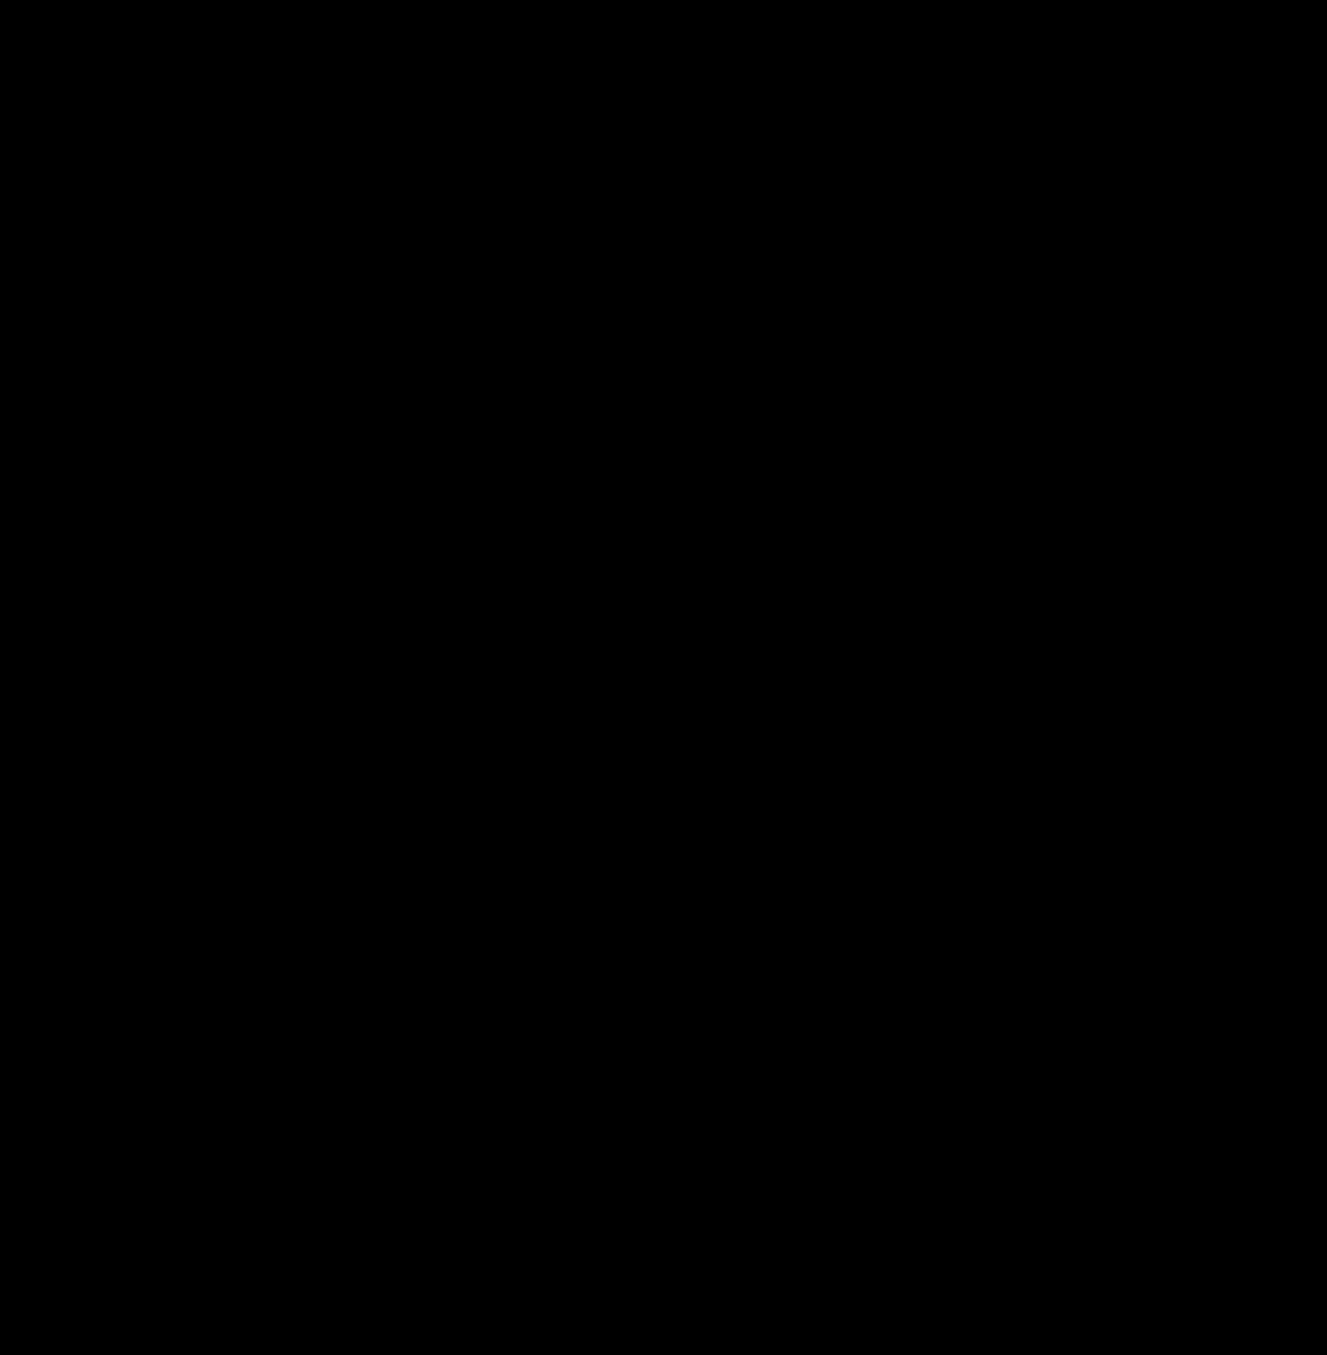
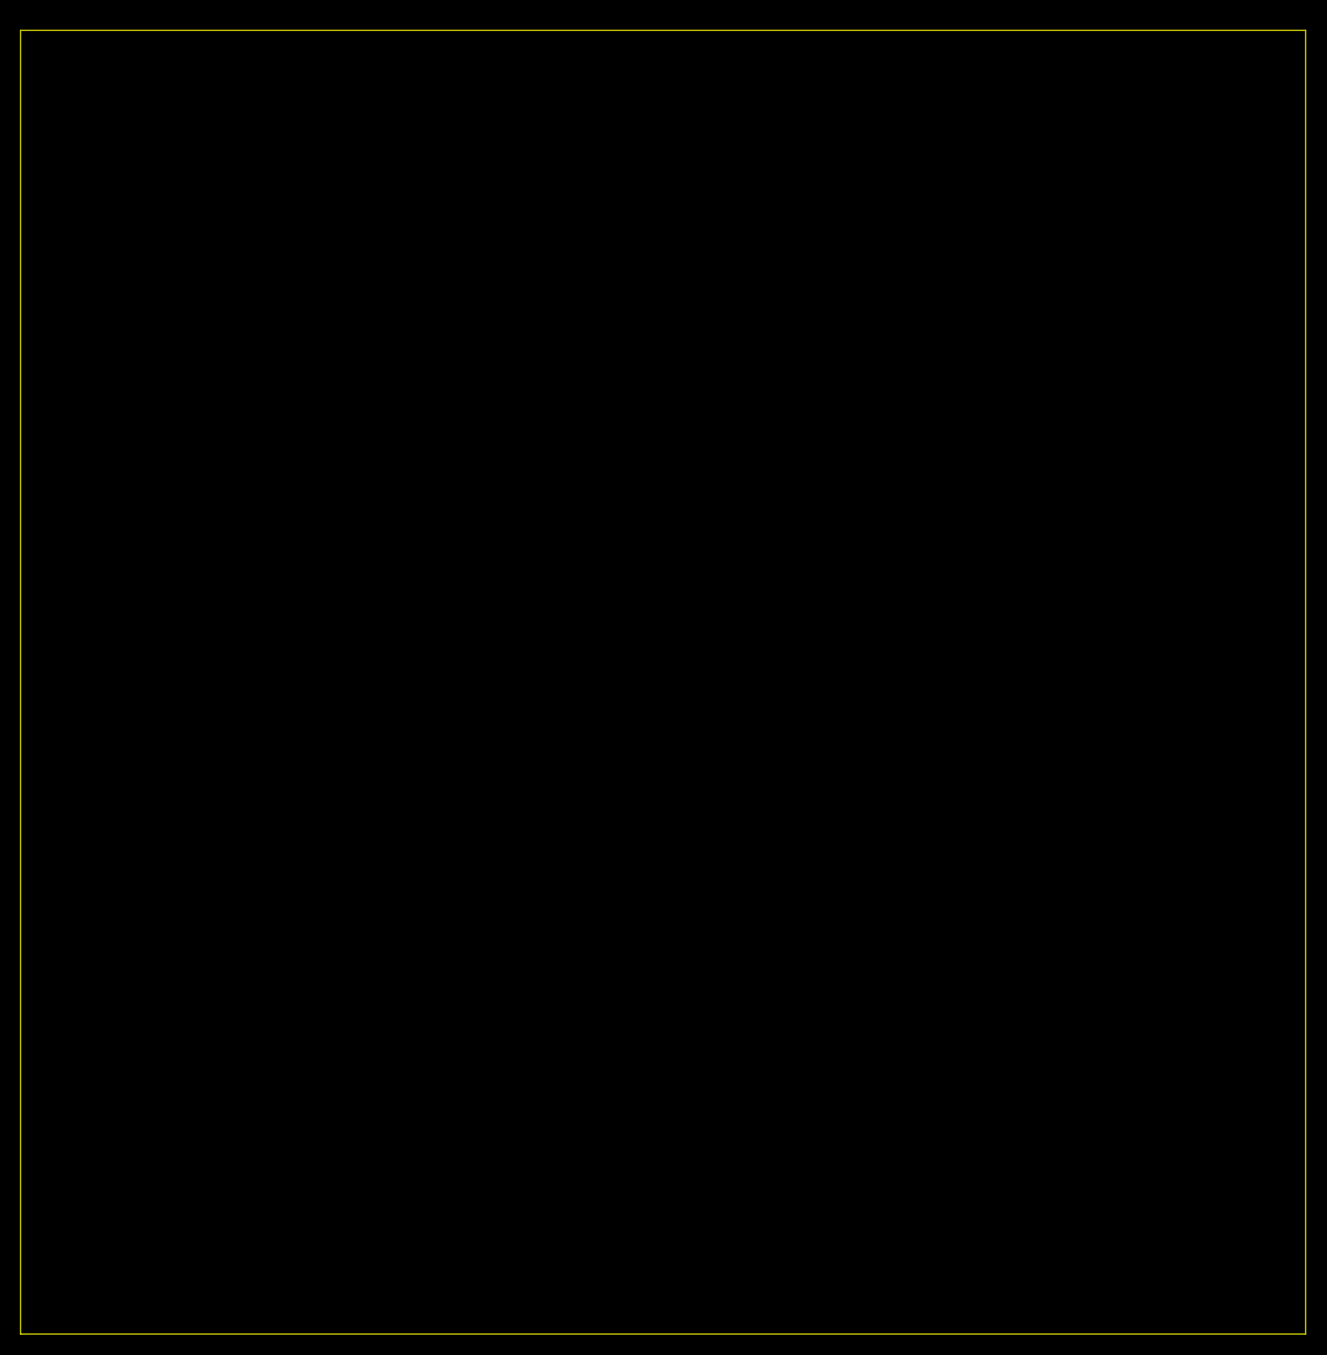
board edge: none -> (20, 30) (1305, 30) (1305, 1334) (20, 1334) (20, 30)

